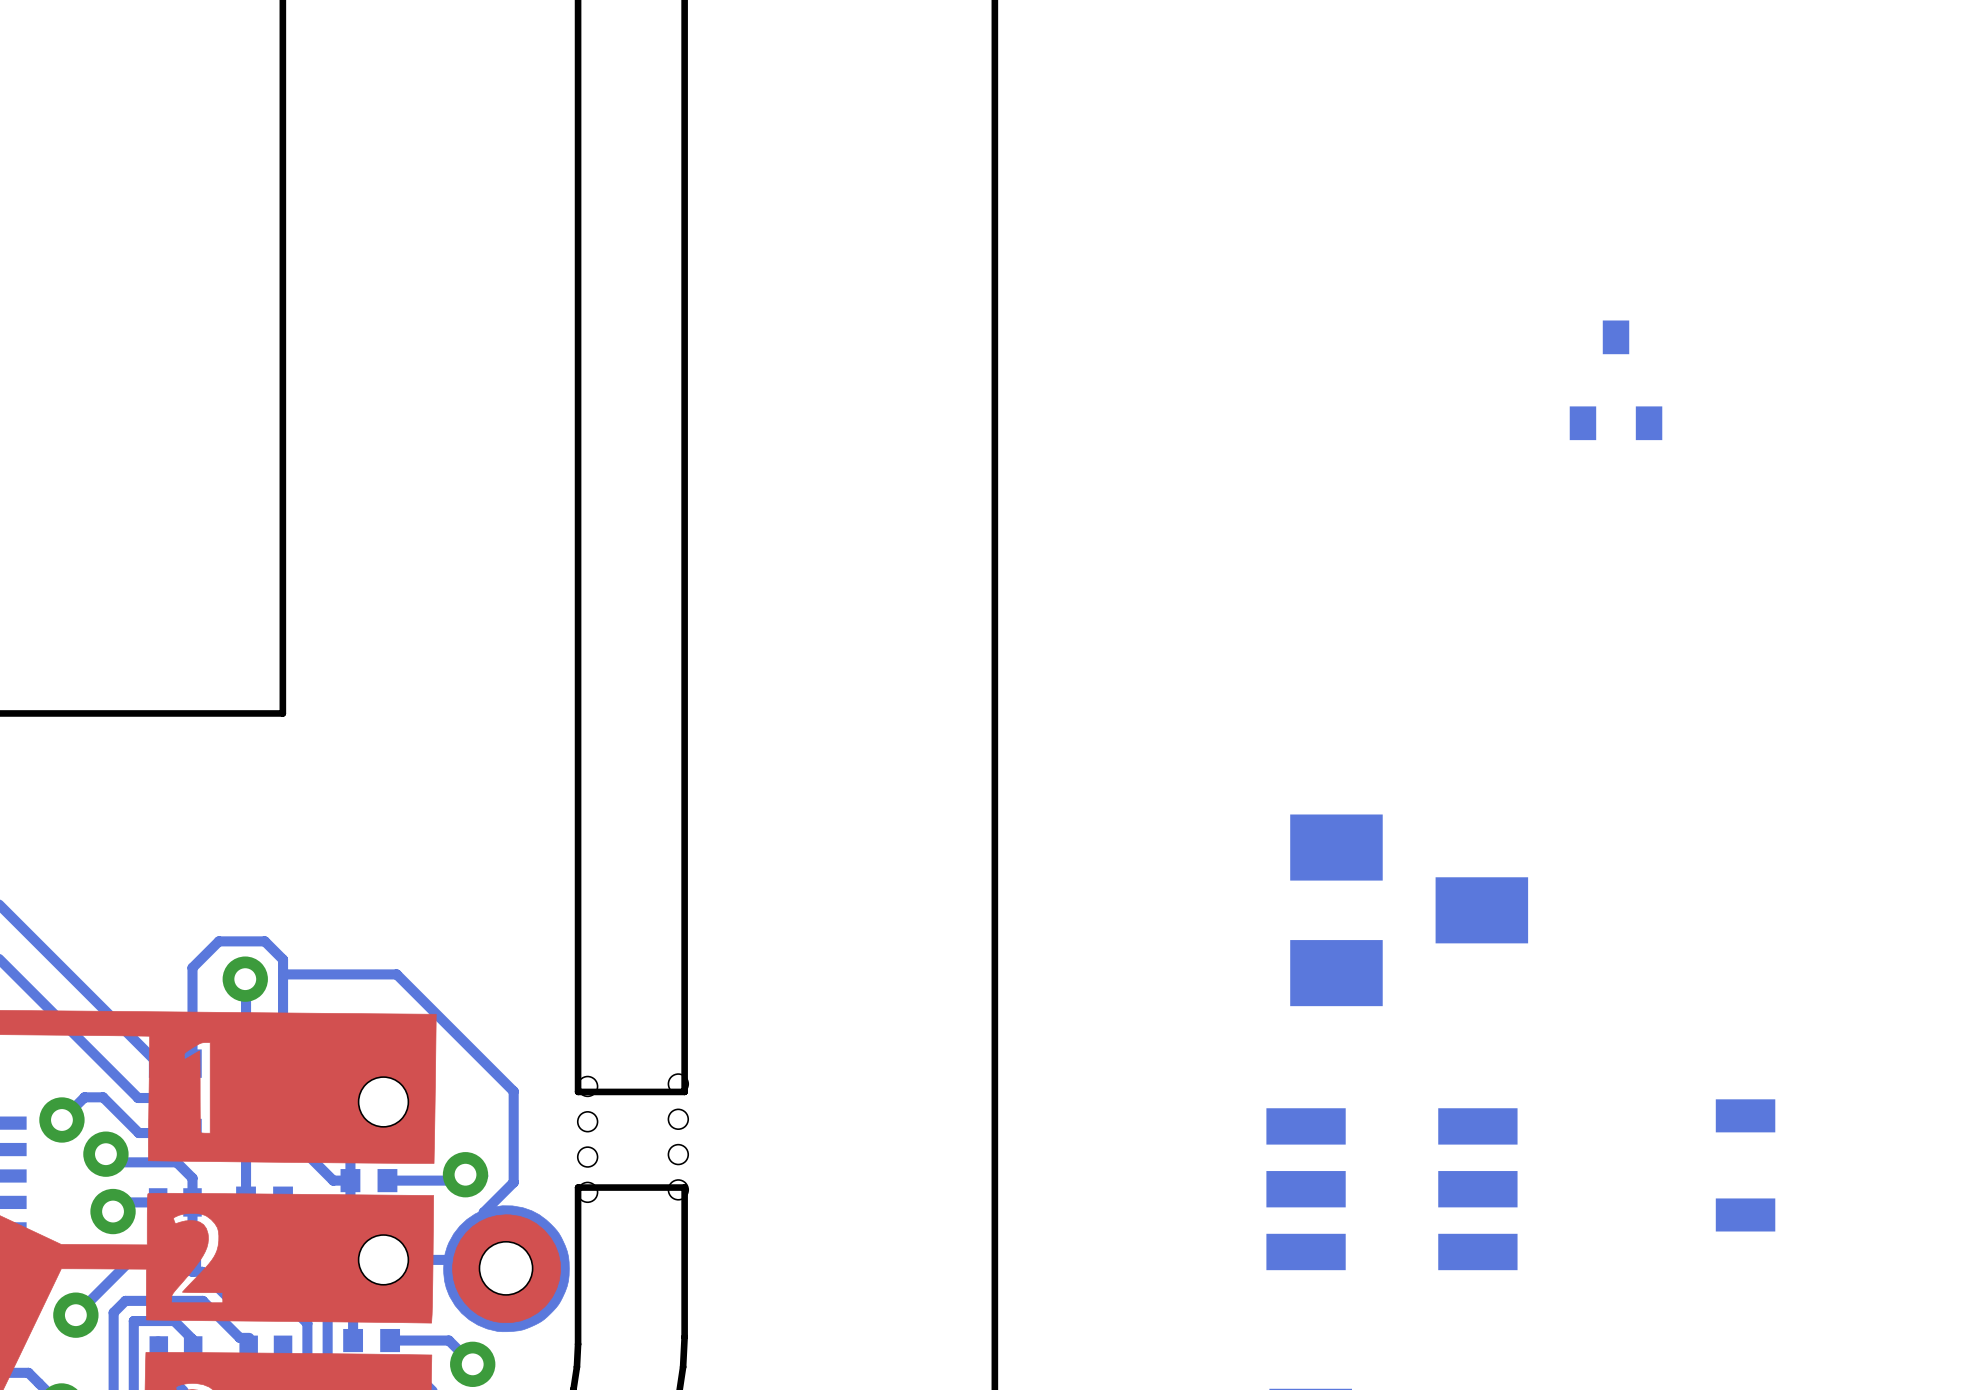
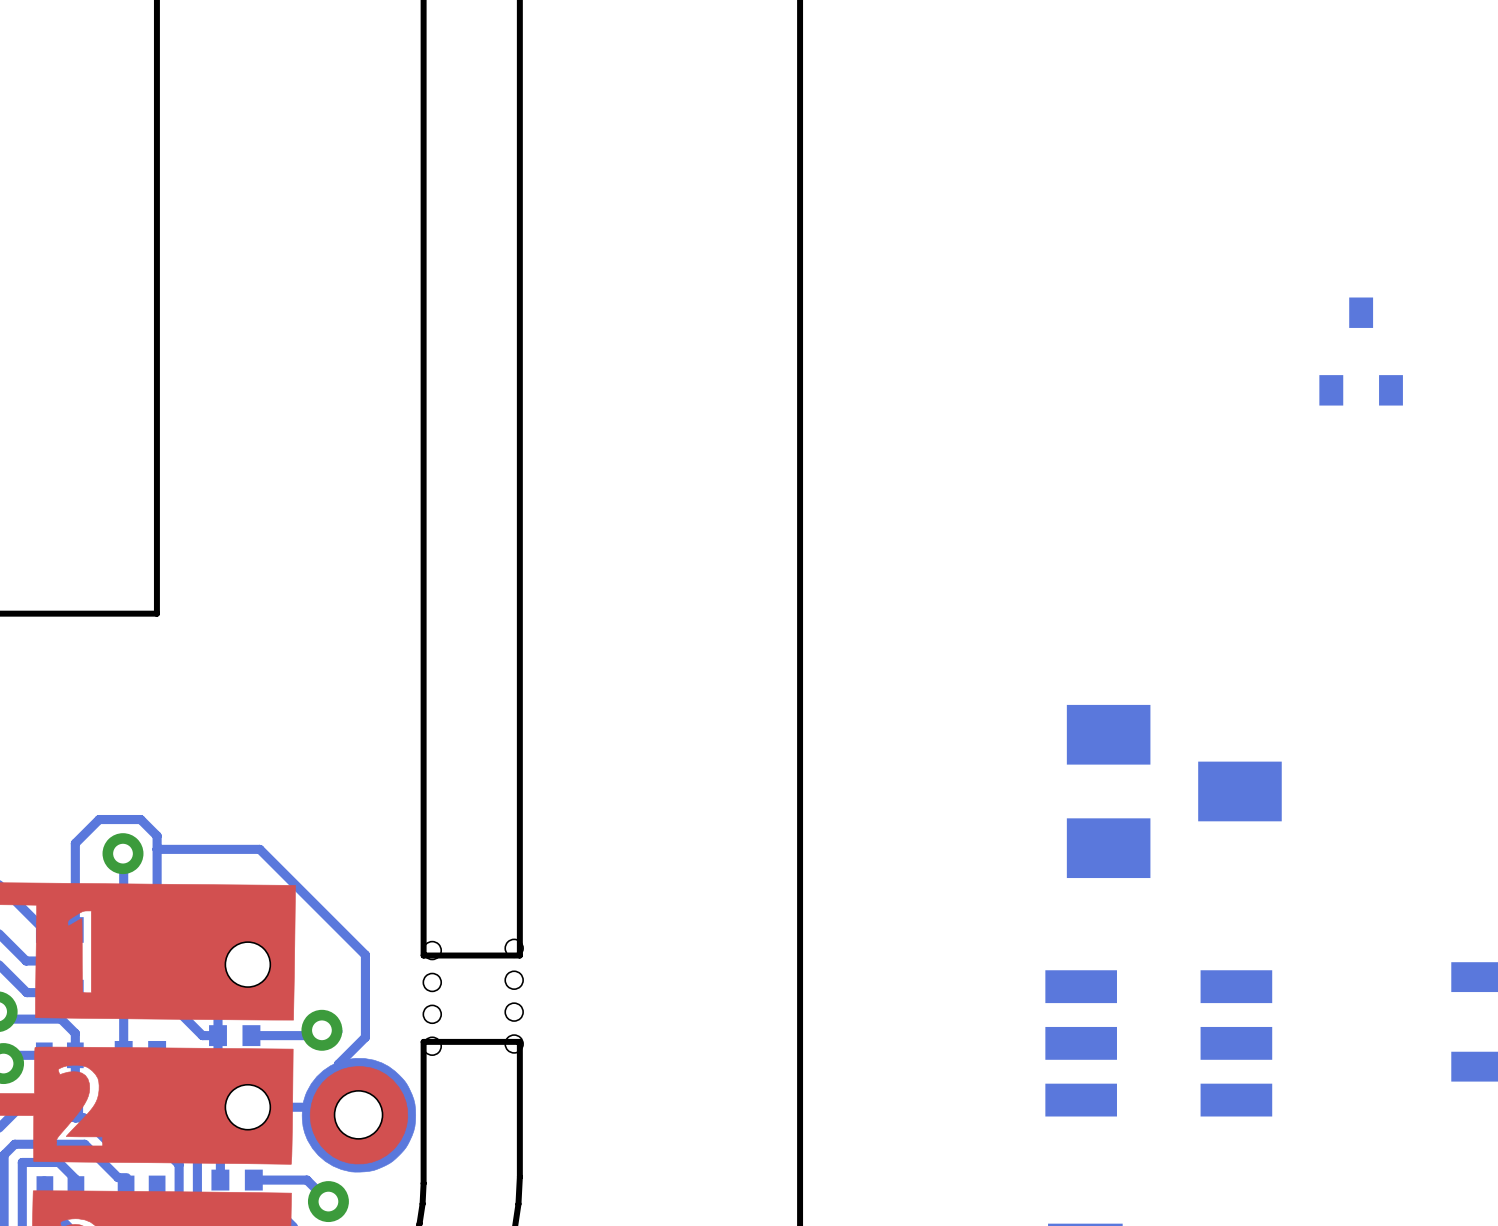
part position: (1616, 380) -> (1361, 351)

